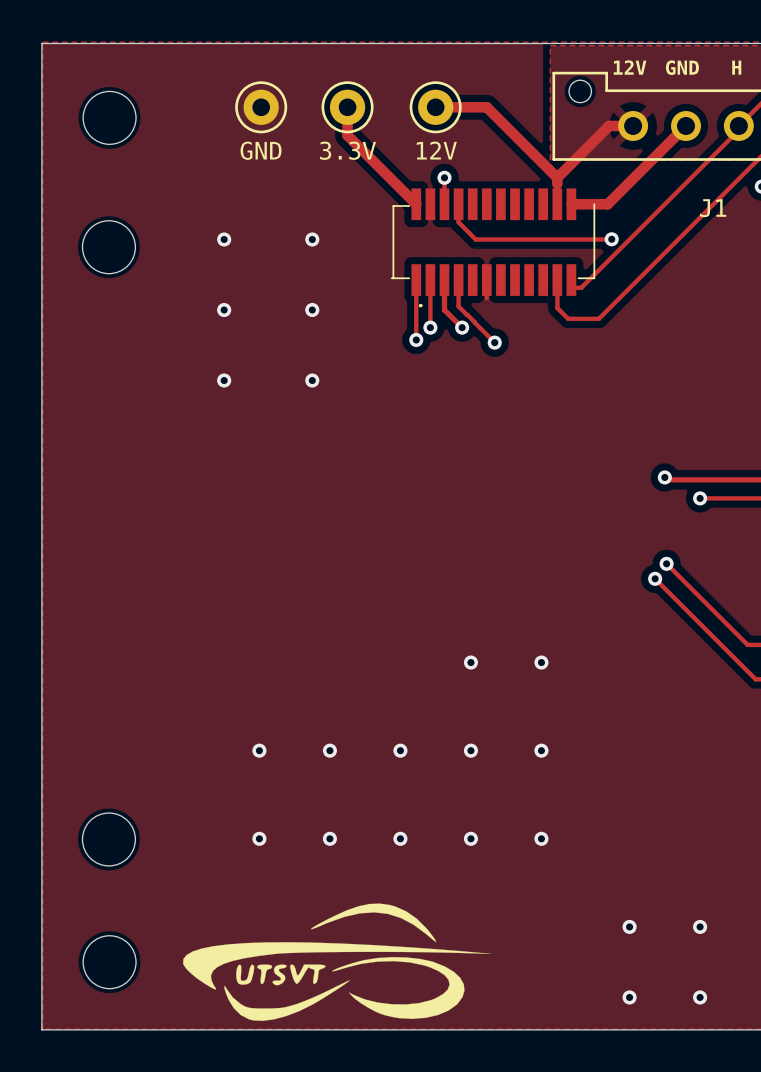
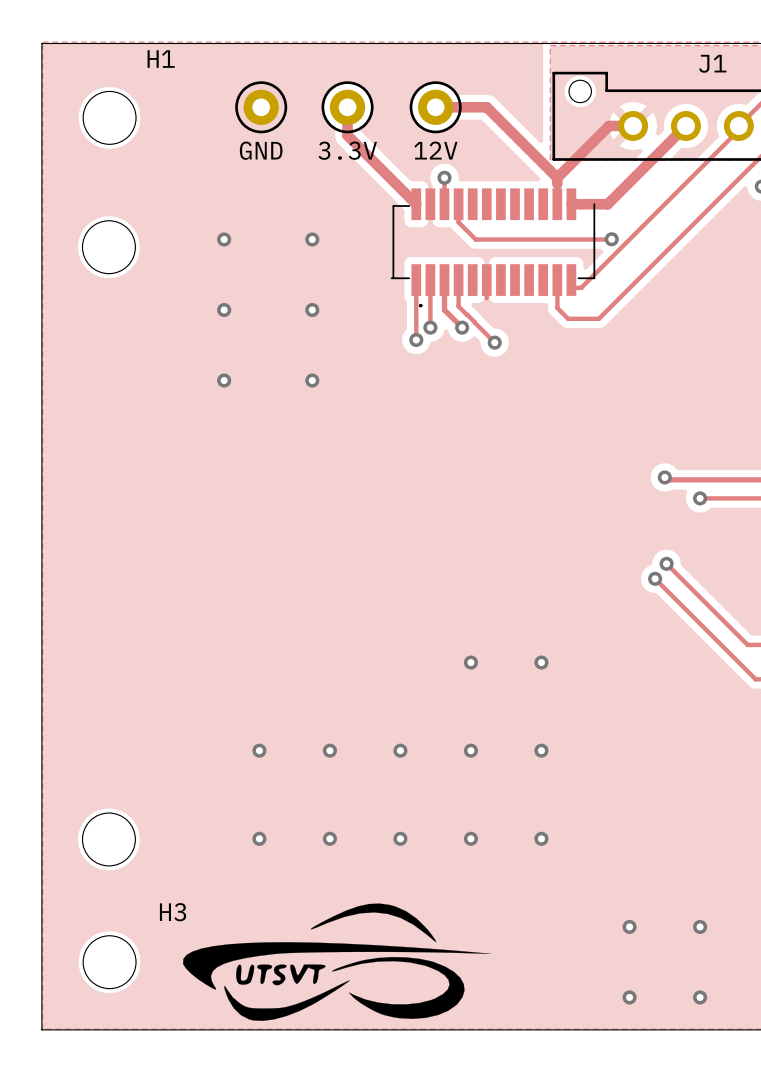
H1 name: none -> H1 (161, 59)
text: 12V (630, 67) -> none
text: GND (682, 67) -> none
text: H (736, 67) -> none
J1 name position: J1 (713, 208) -> J1 (712, 63)
H3 name: none -> H3 (173, 912)

